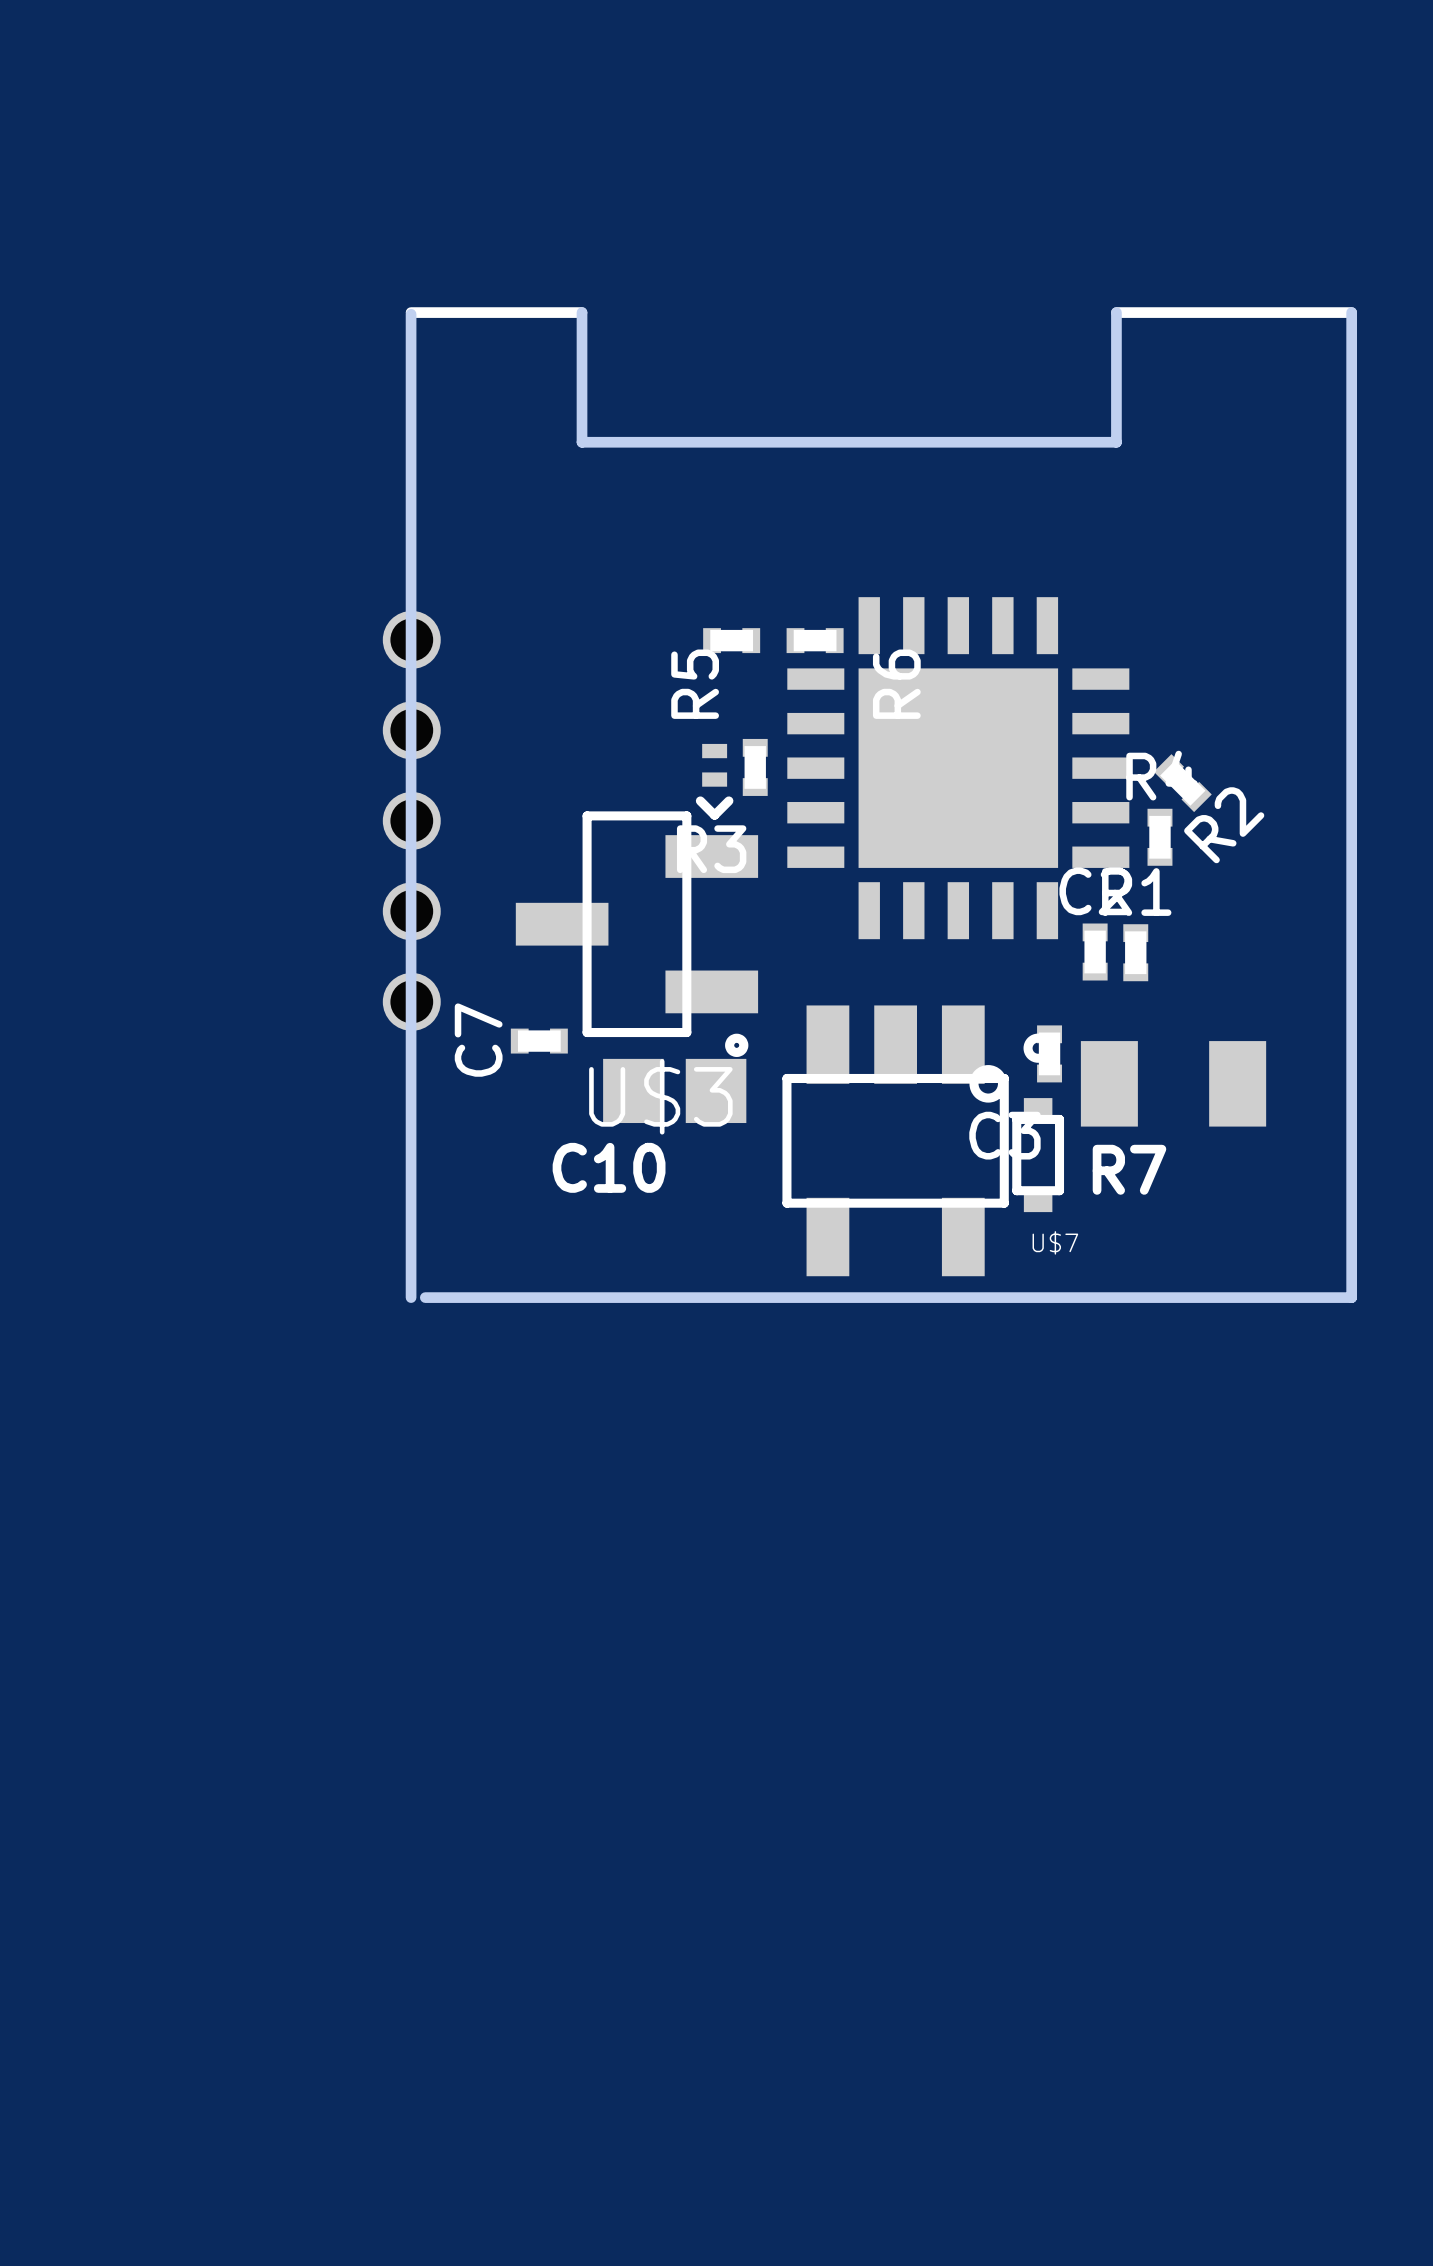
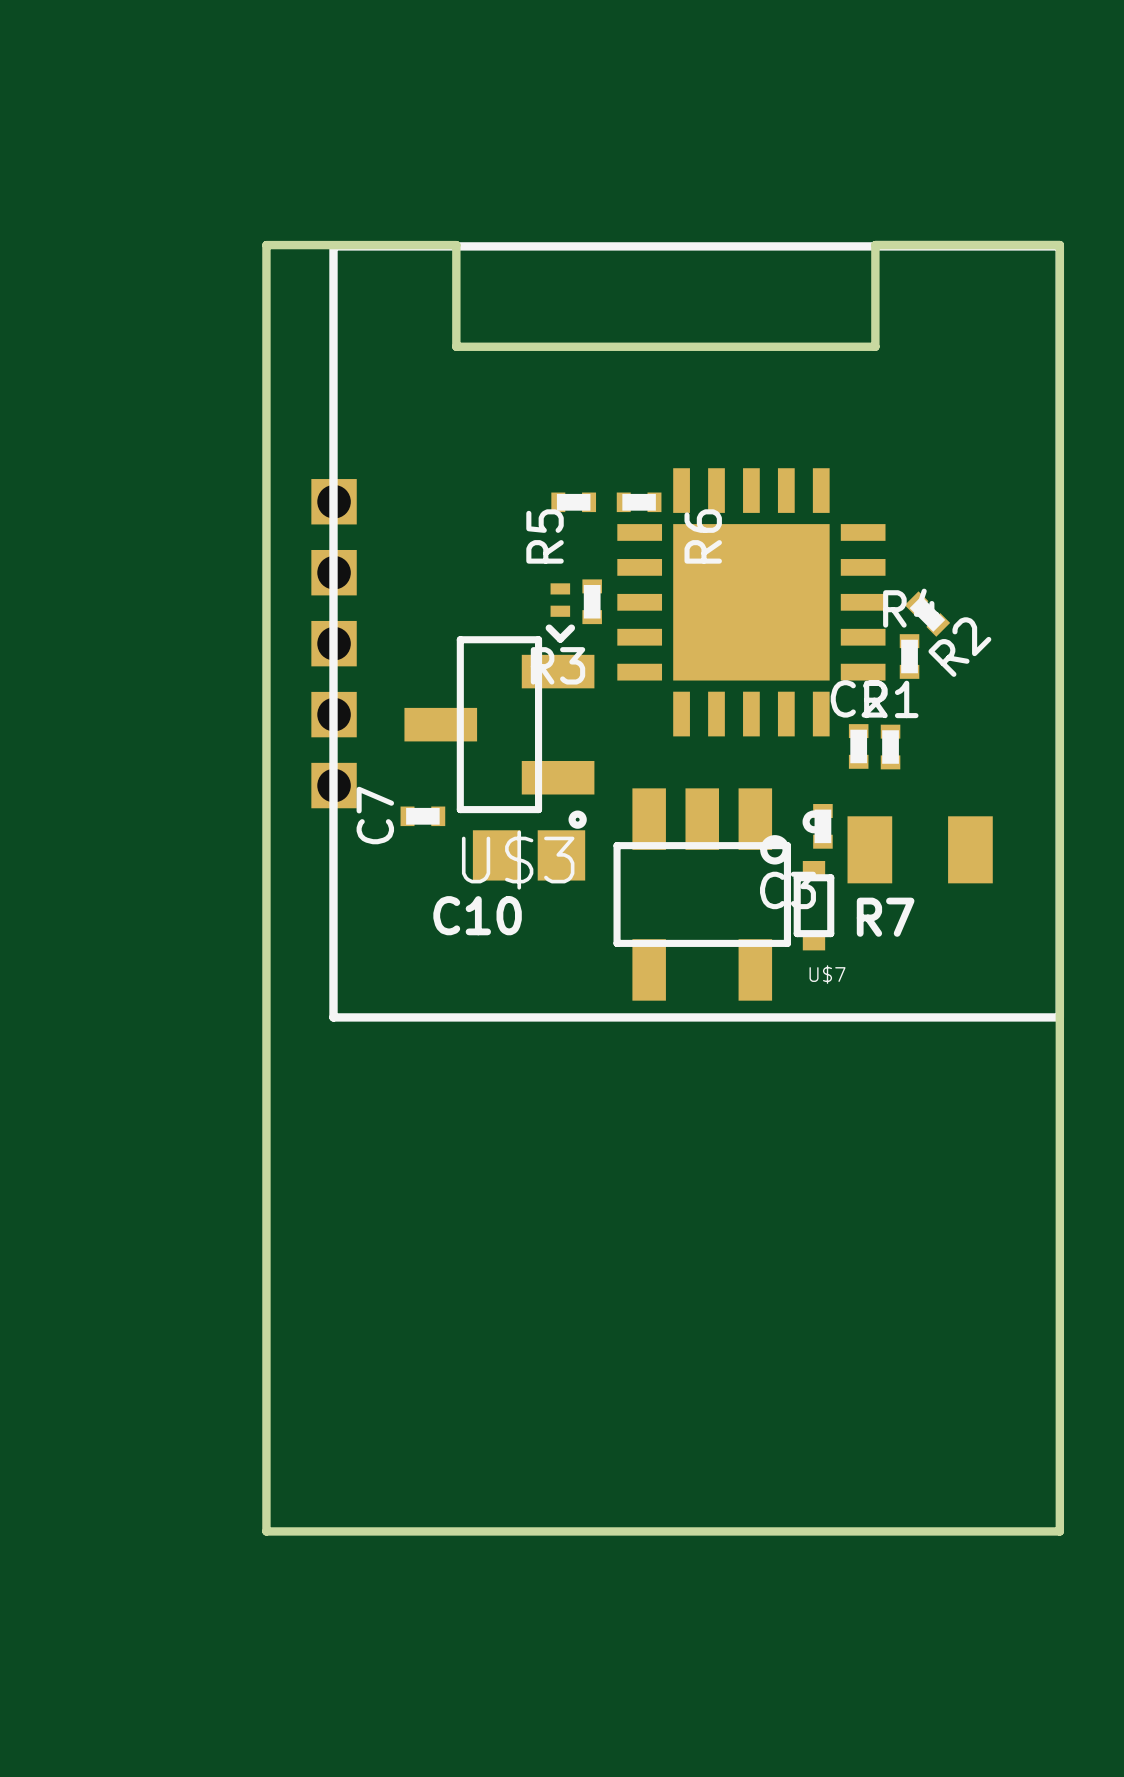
line: (411, 312) (582, 312) -> none
board edge: none -> (875, 245) (1059, 245)
board edge: (411, 314) (411, 1297) -> none
line: none -> (333, 246) (333, 1017) (1059, 1017) (1059, 246) (333, 246)
part footprint: [382, 610, 441, 1031] -> [311, 479, 357, 809]
board edge: (425, 1297) (1351, 1297) -> (456, 245) (266, 245) (266, 1531) (1059, 1531) (1059, 1017)

